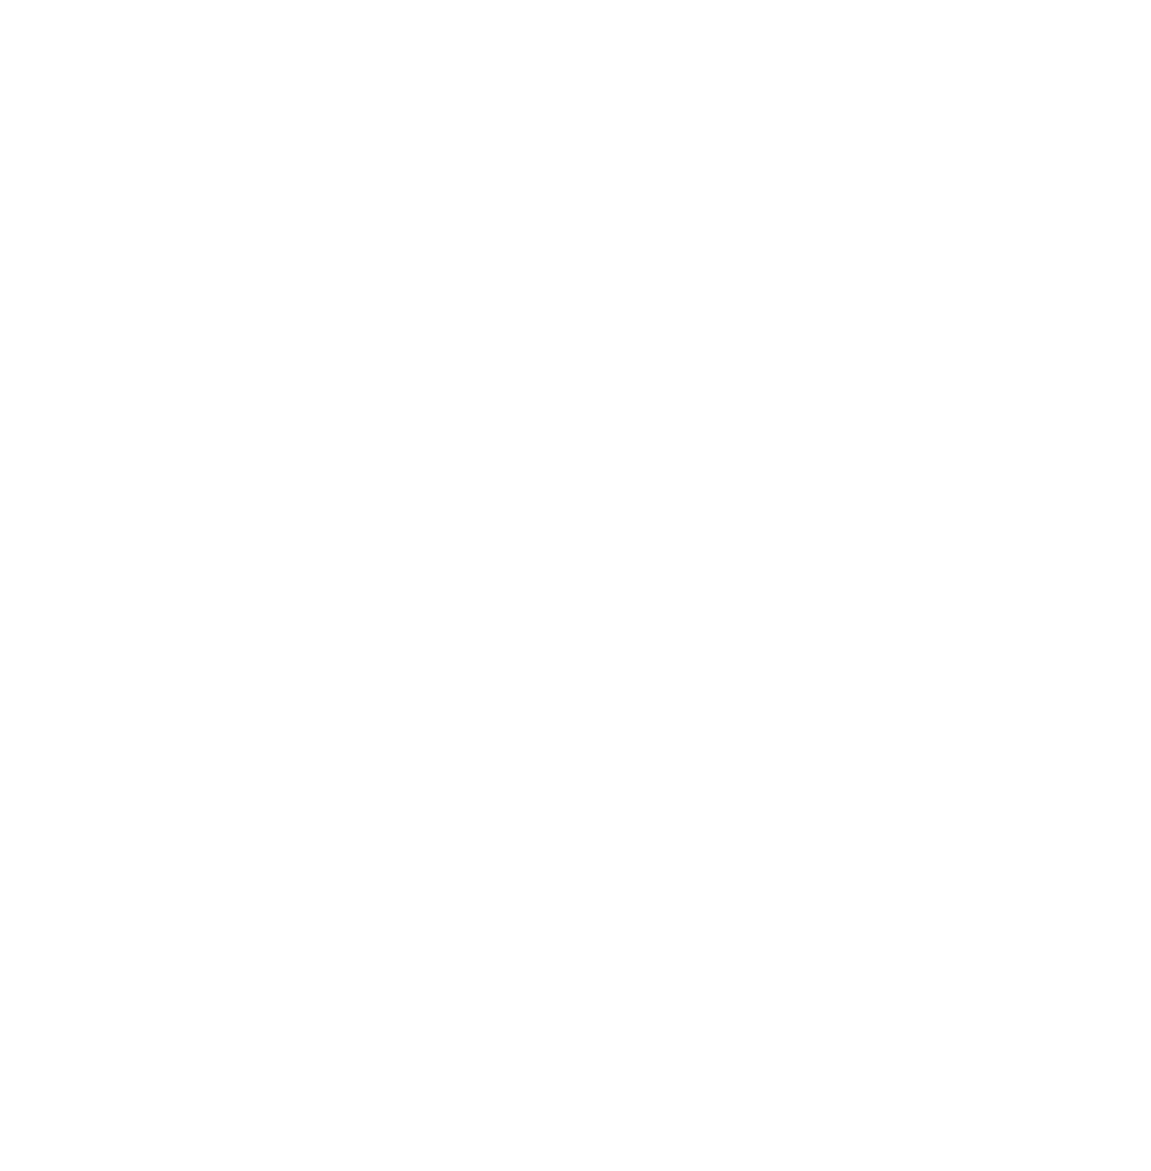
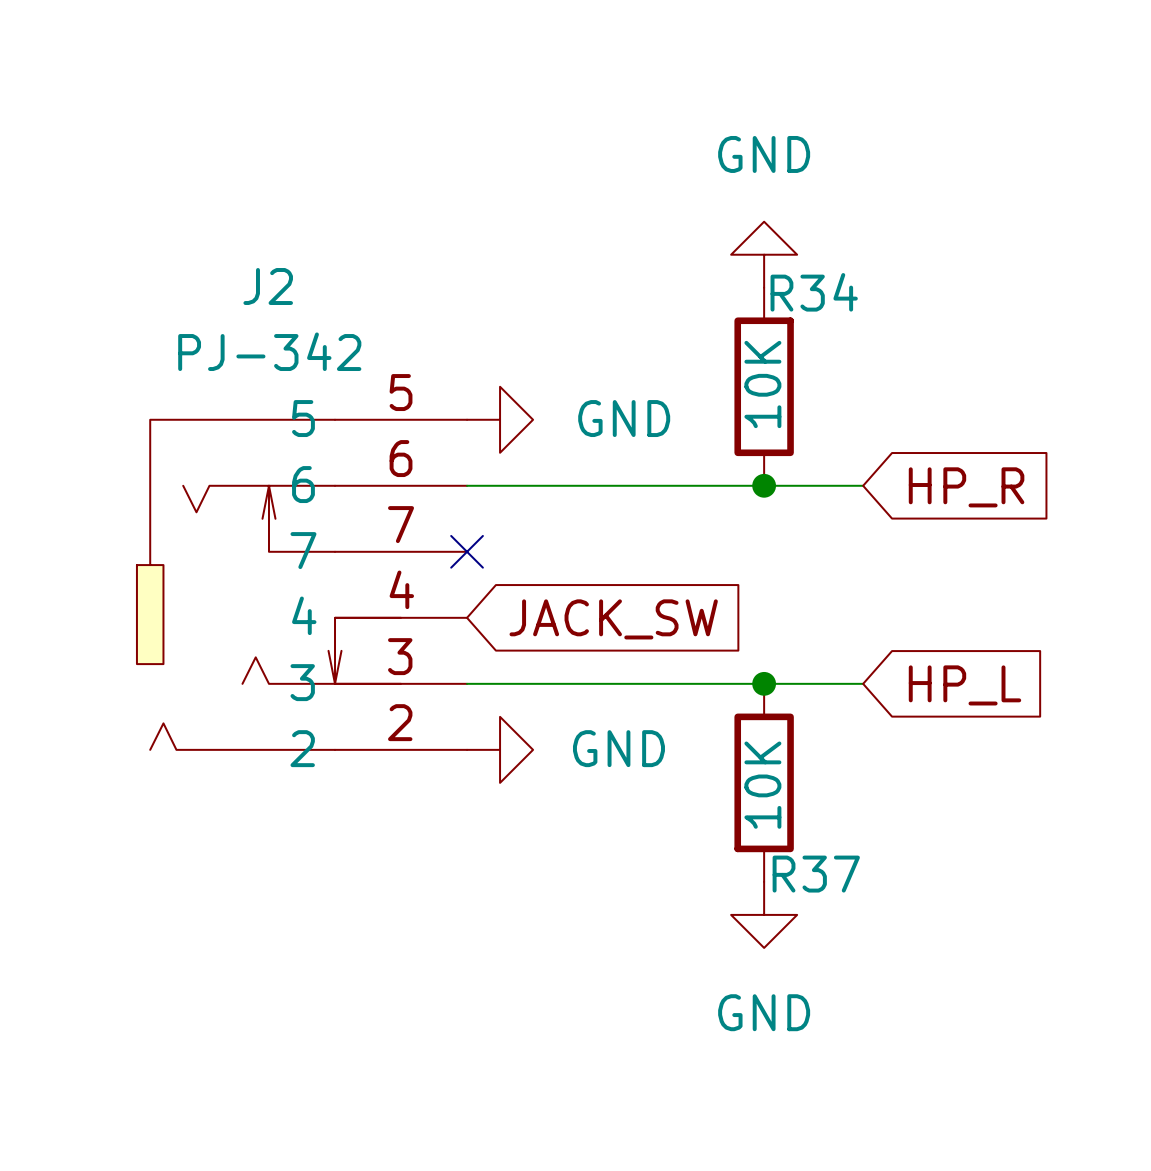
power symbol: none -> GND (764, 254)
R34: none -> 10K (764, 386)
power symbol: none -> GND (500, 419)
wire: none -> (467, 485) (863, 485)
junction: none -> (764, 485)
global label: none -> HP_R (966, 487)
no-connect mark: none -> (467, 551)
J2: none -> PJ-342 (302, 584)
global label: none -> JACK_SW (613, 619)
wire: none -> (467, 683) (863, 683)
junction: none -> (764, 683)
global label: none -> HP_L (964, 685)
power symbol: none -> GND (500, 749)
R37: none -> 10K (764, 782)
power symbol: none -> GND (764, 914)

